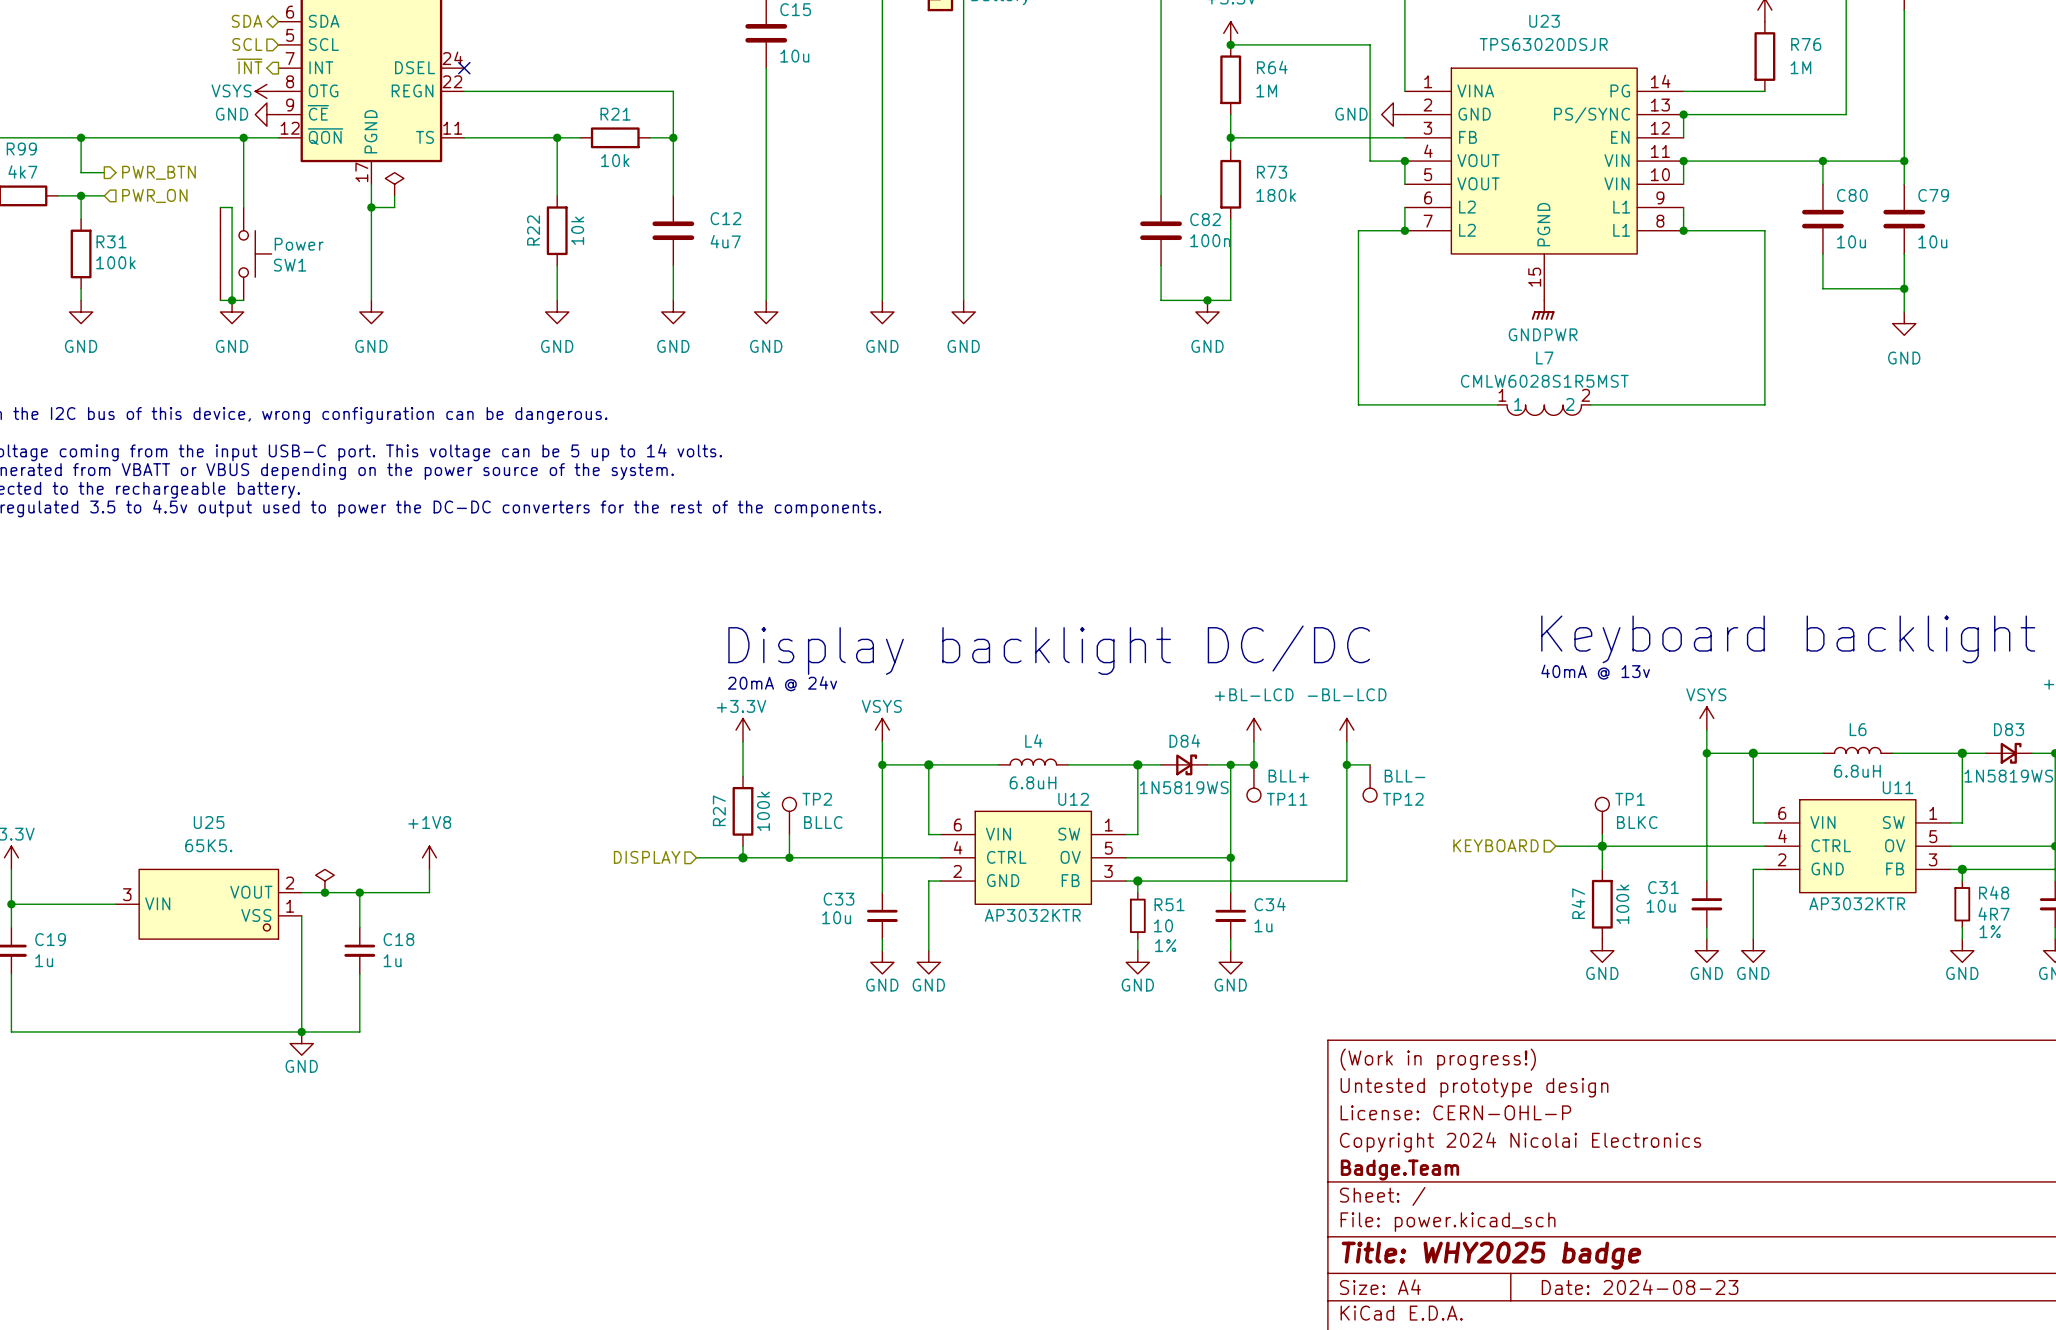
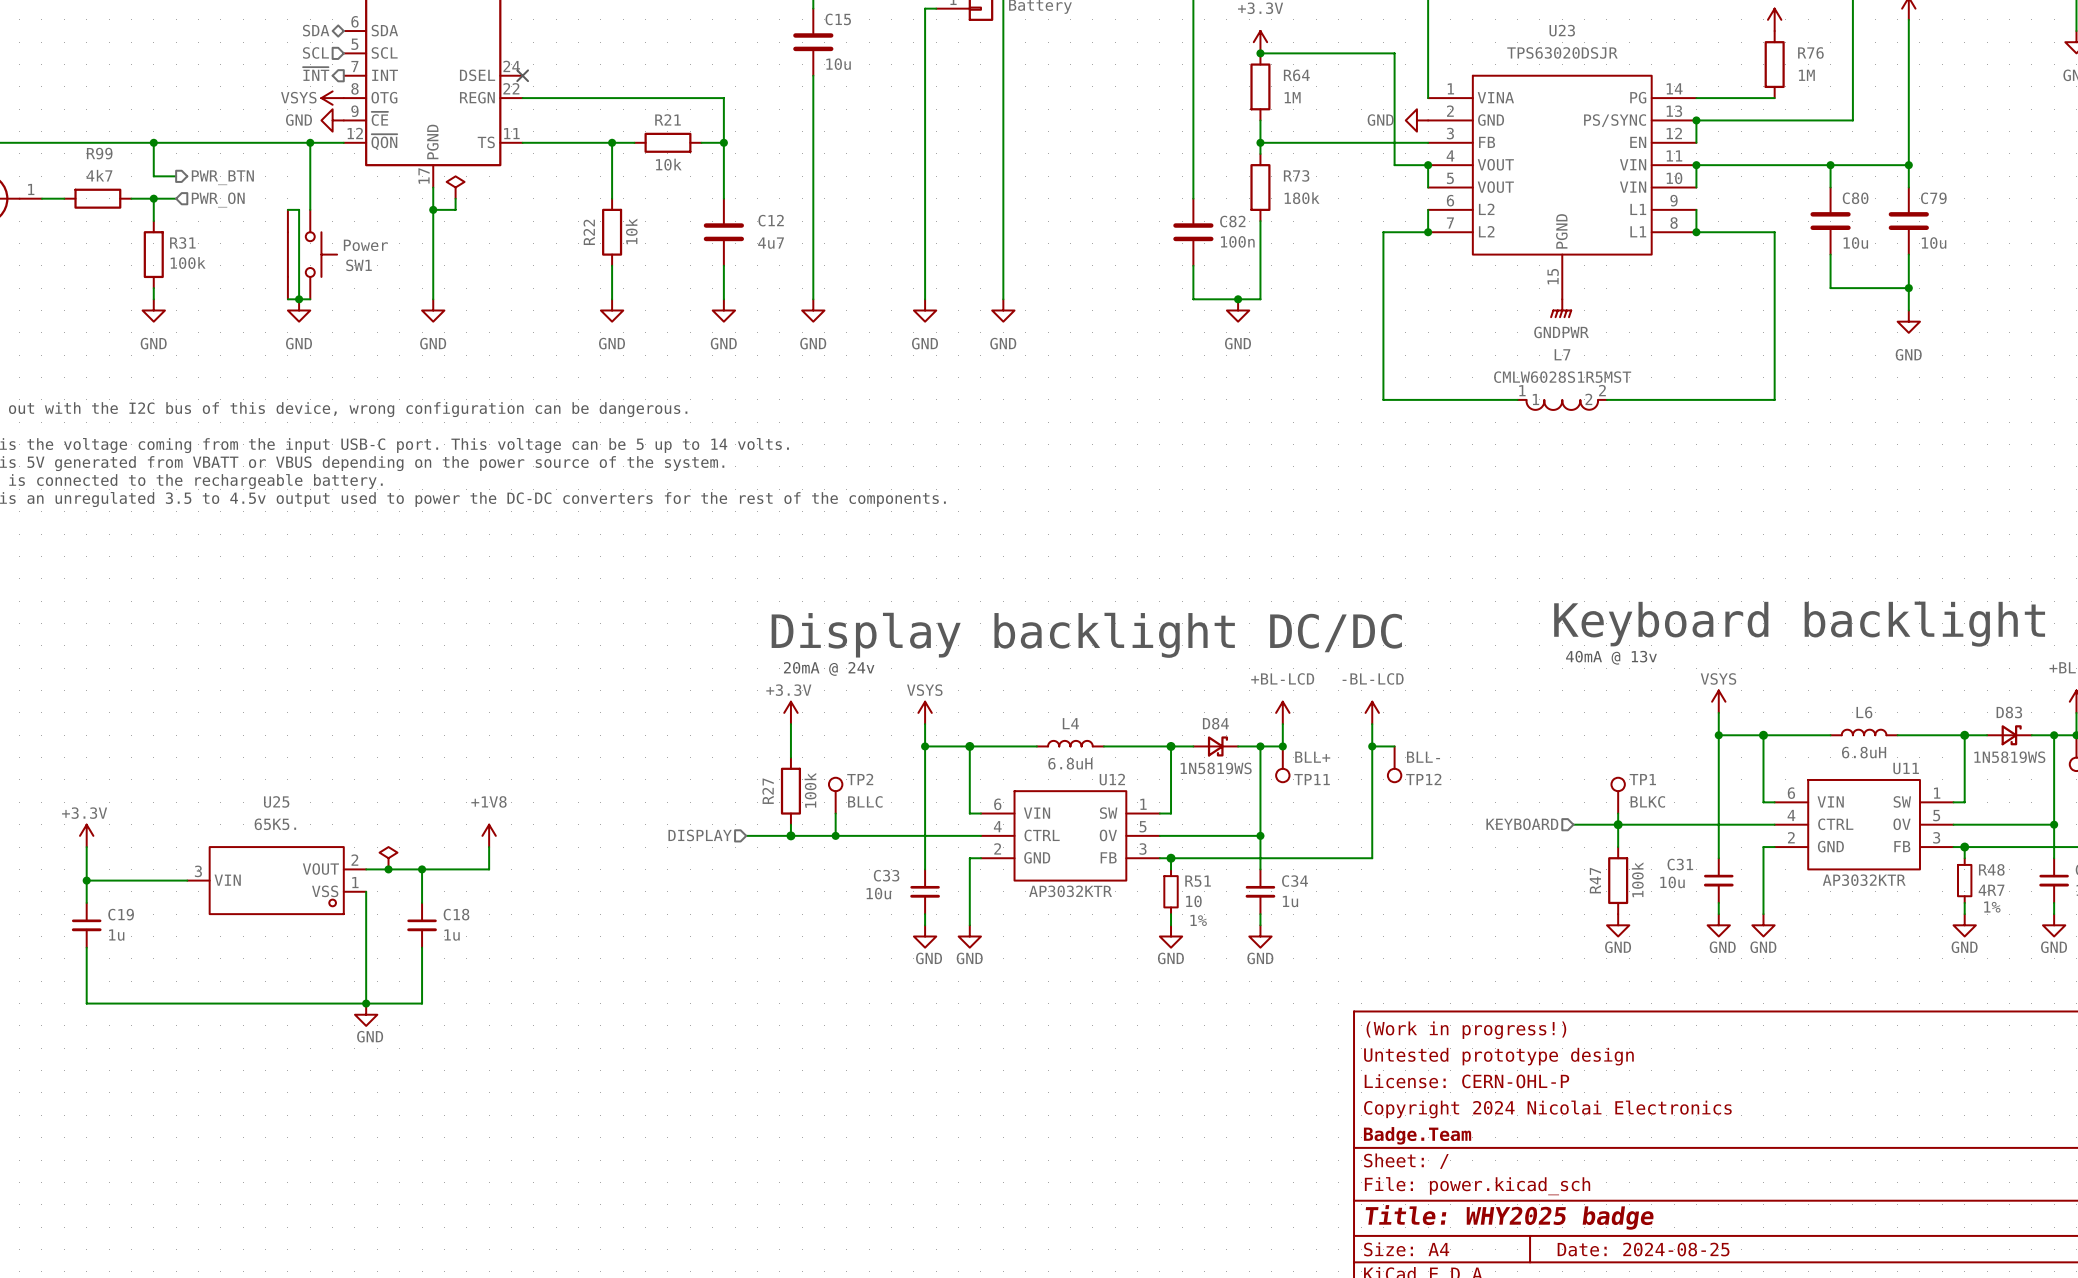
title block: Date: 2024-08-23 (1640, 1287) -> Date: 2024-08-25 (1643, 1249)

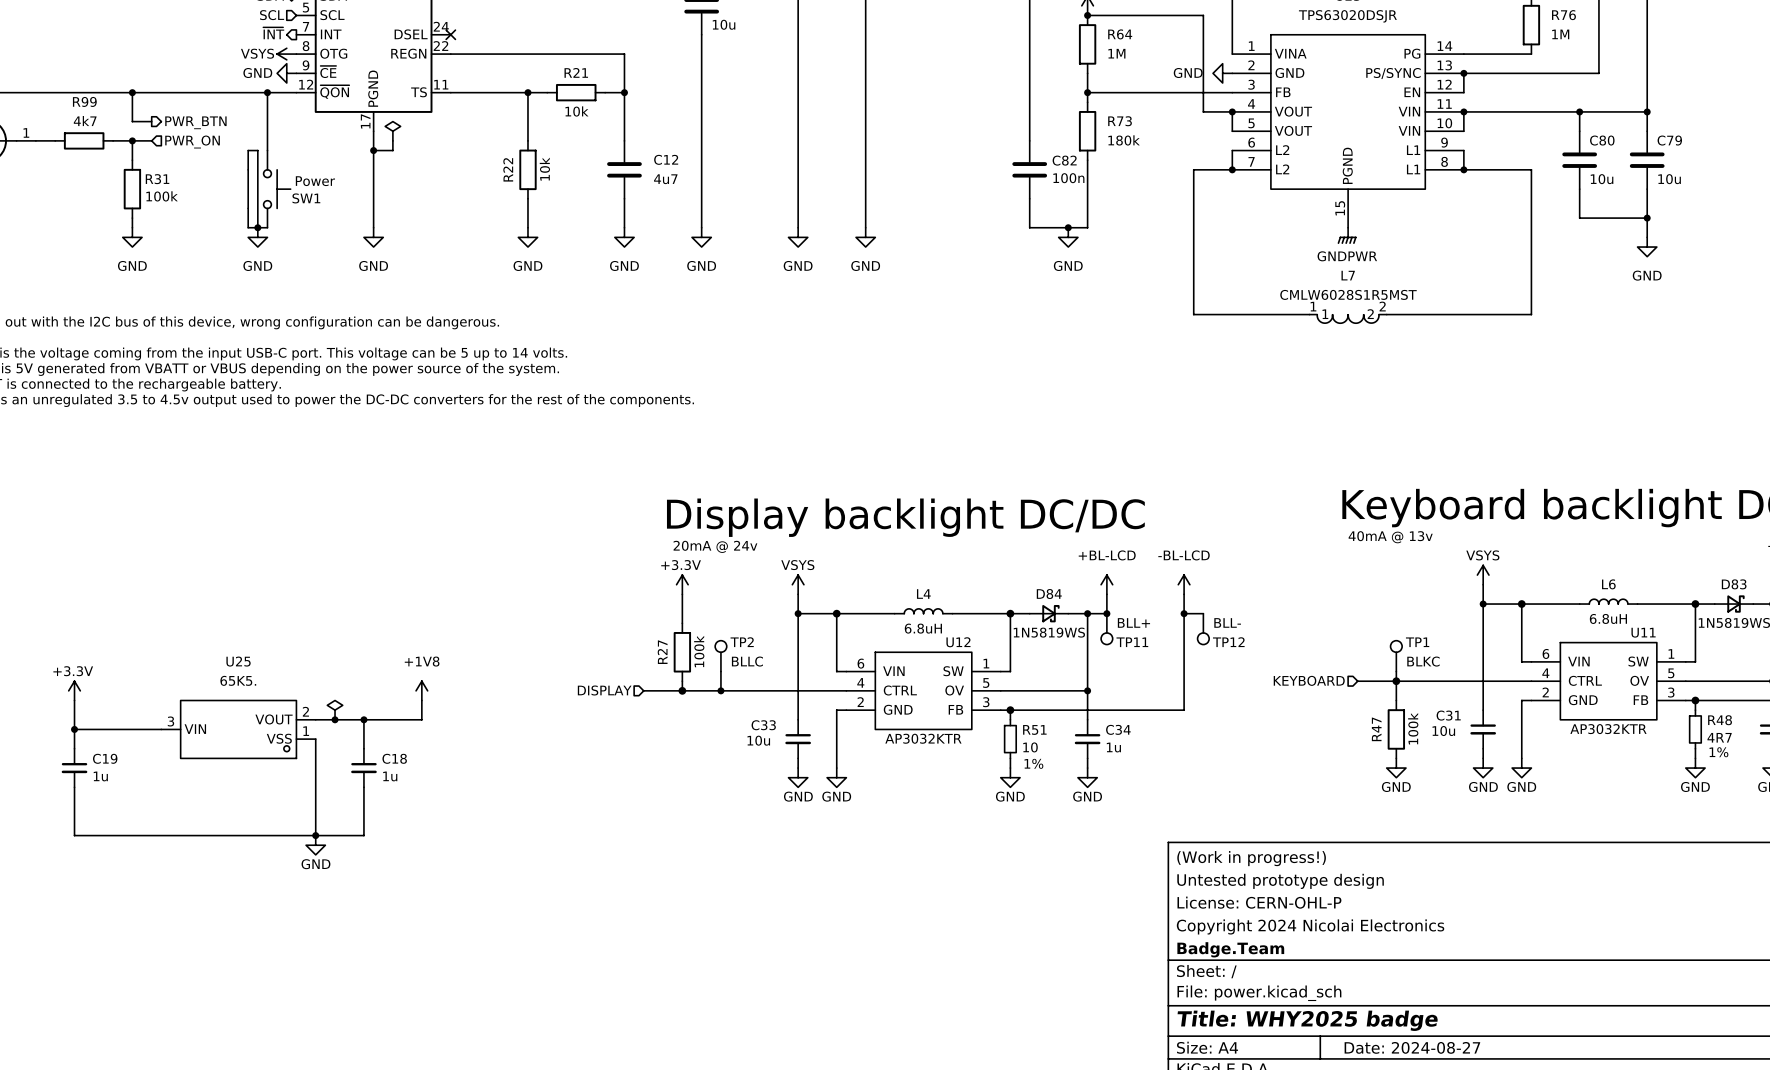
title block: Date: 2024-08-25 (1643, 1249) -> Date: 2024-08-27 (1412, 1047)

